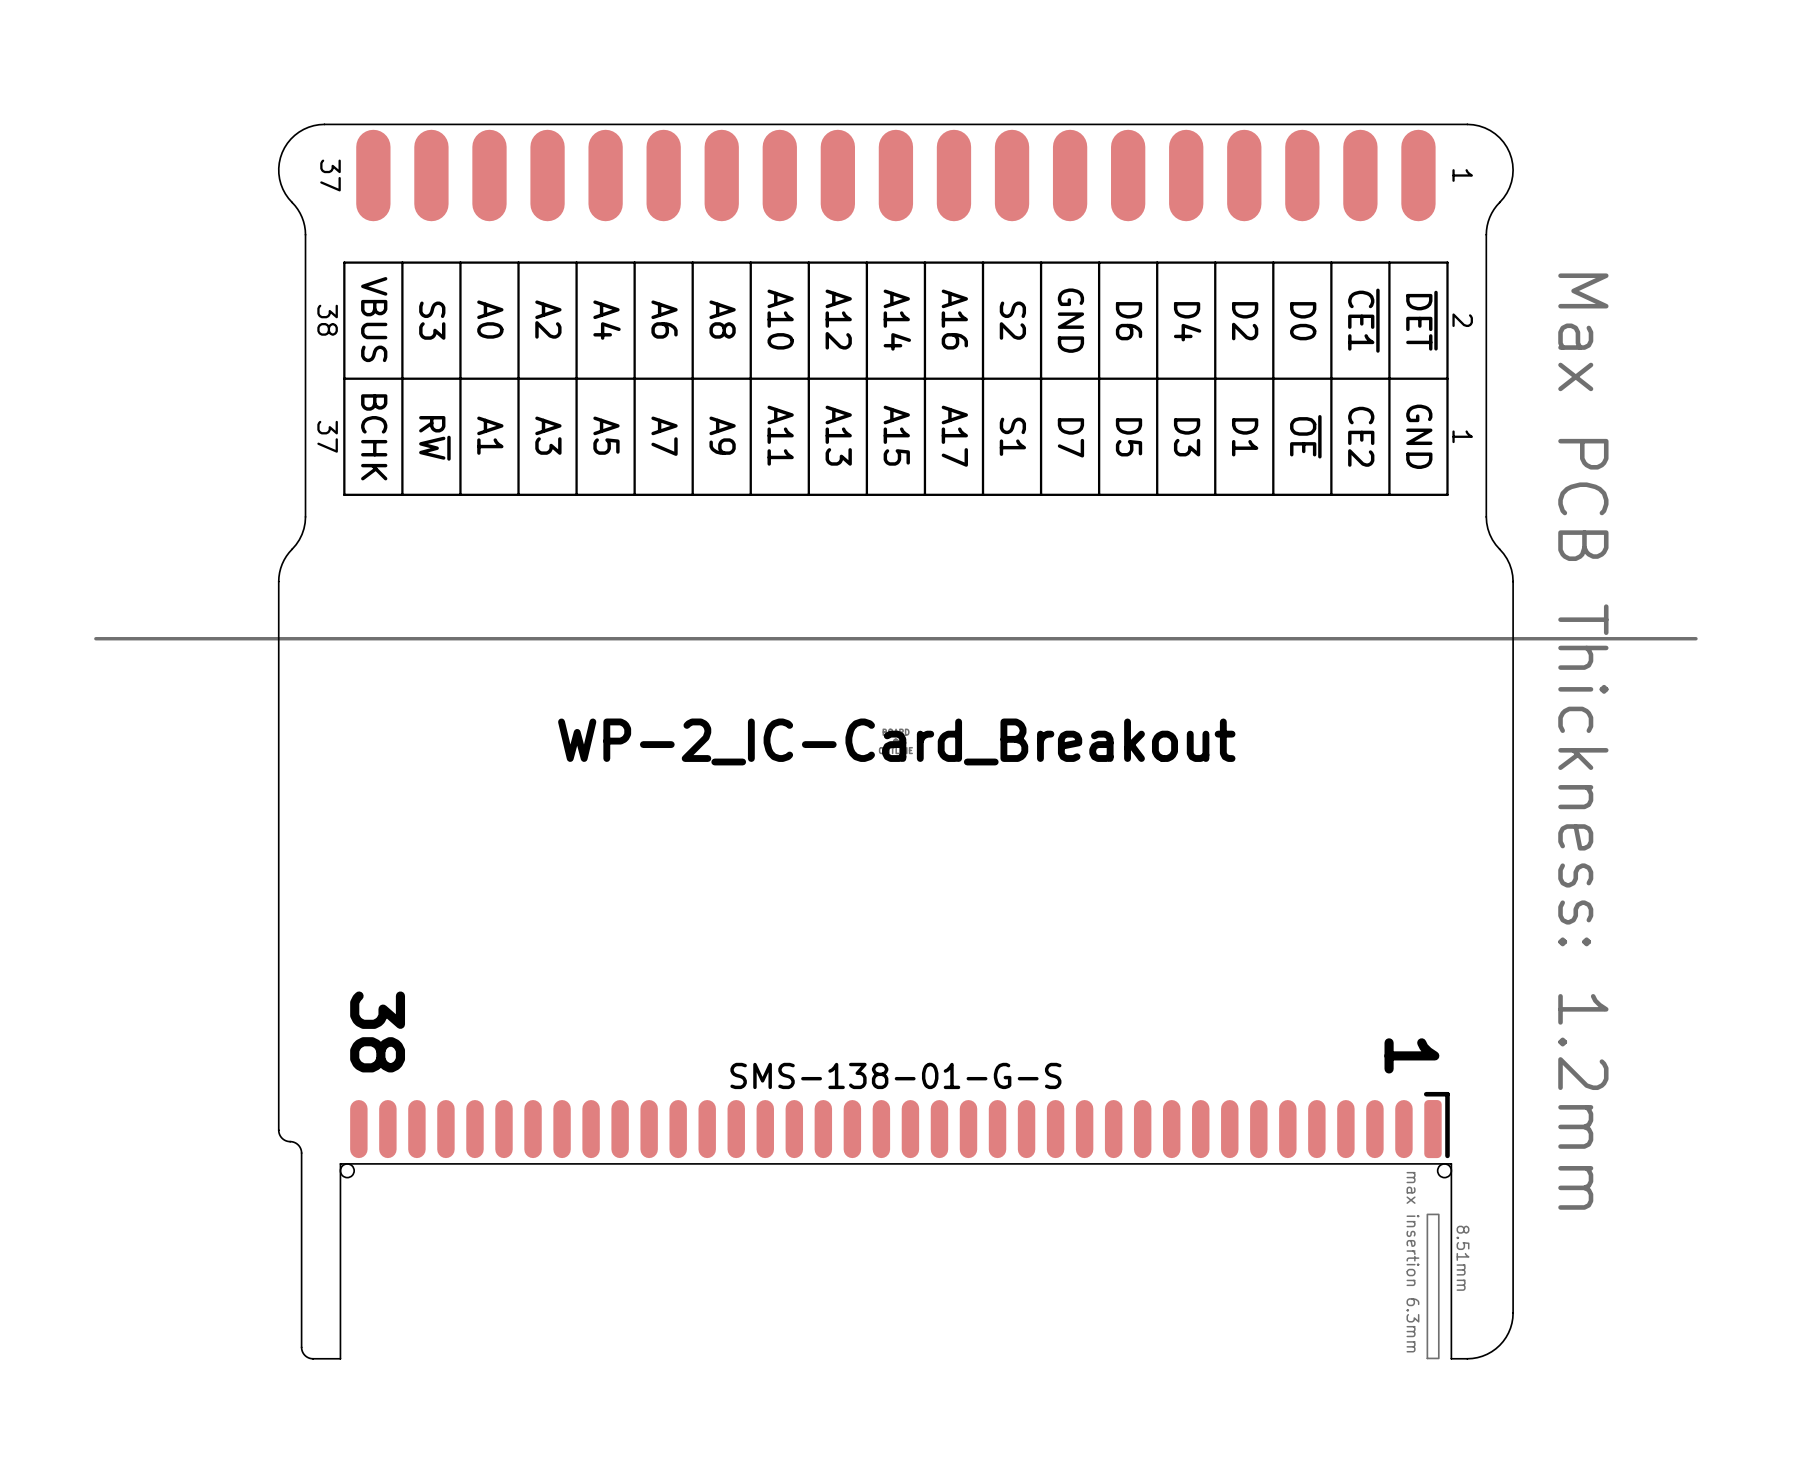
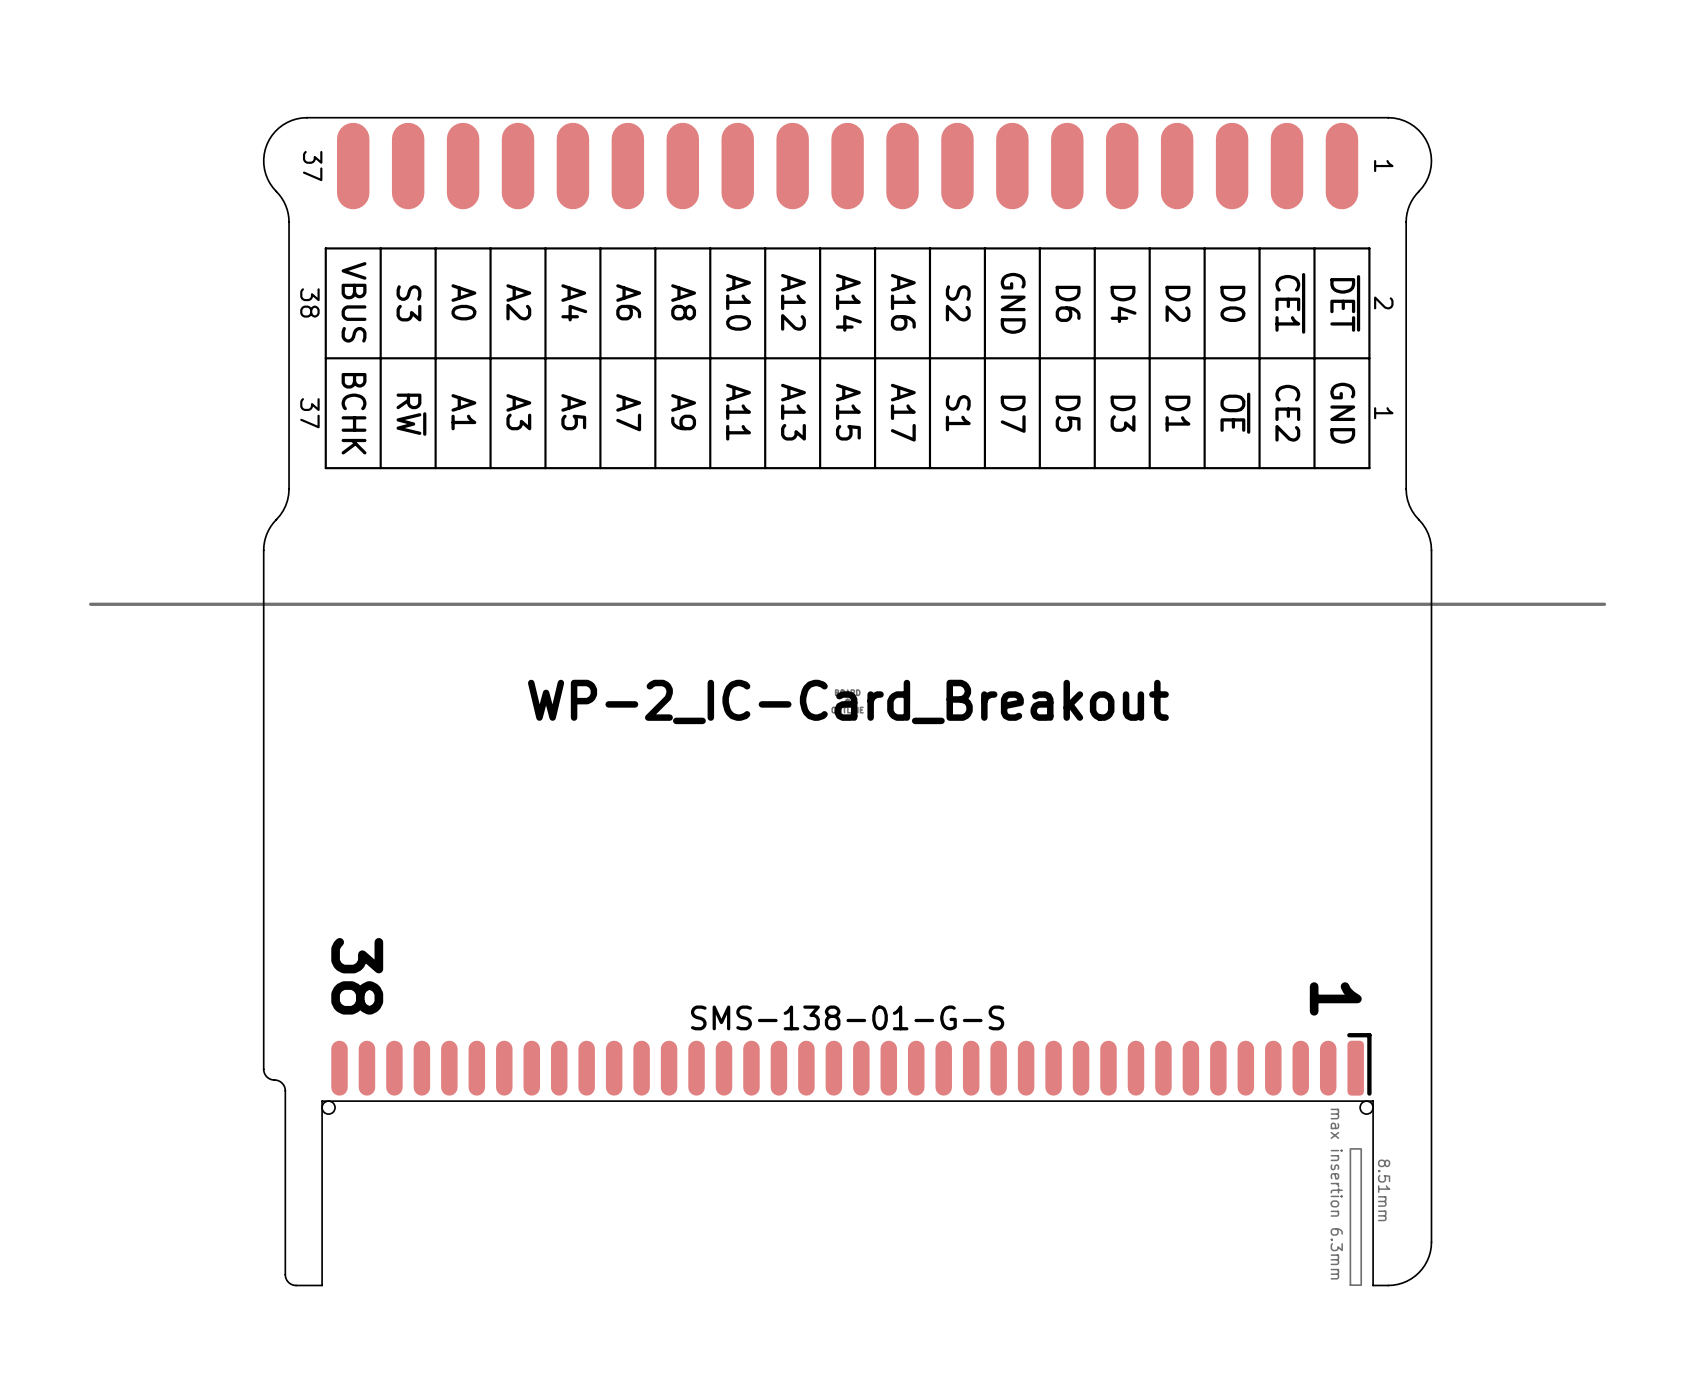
text: Max PCB Thickness: 1.2mm (1583, 741) -> none

